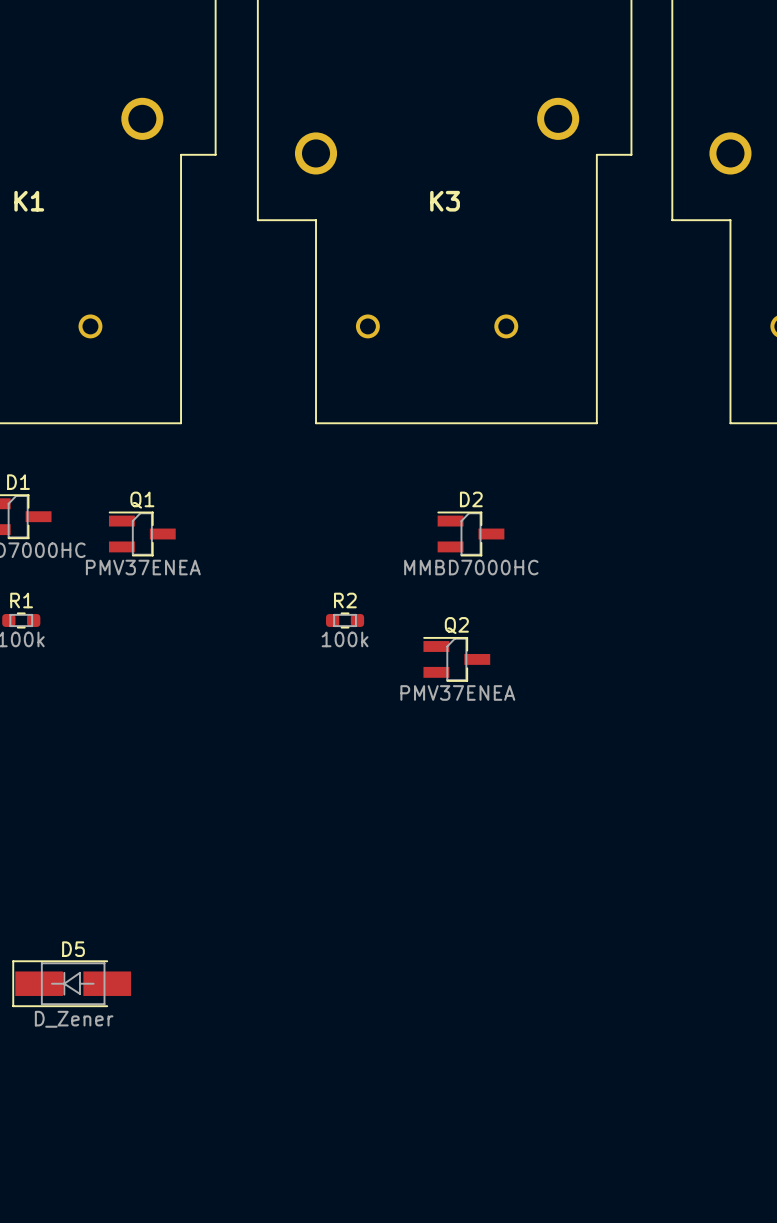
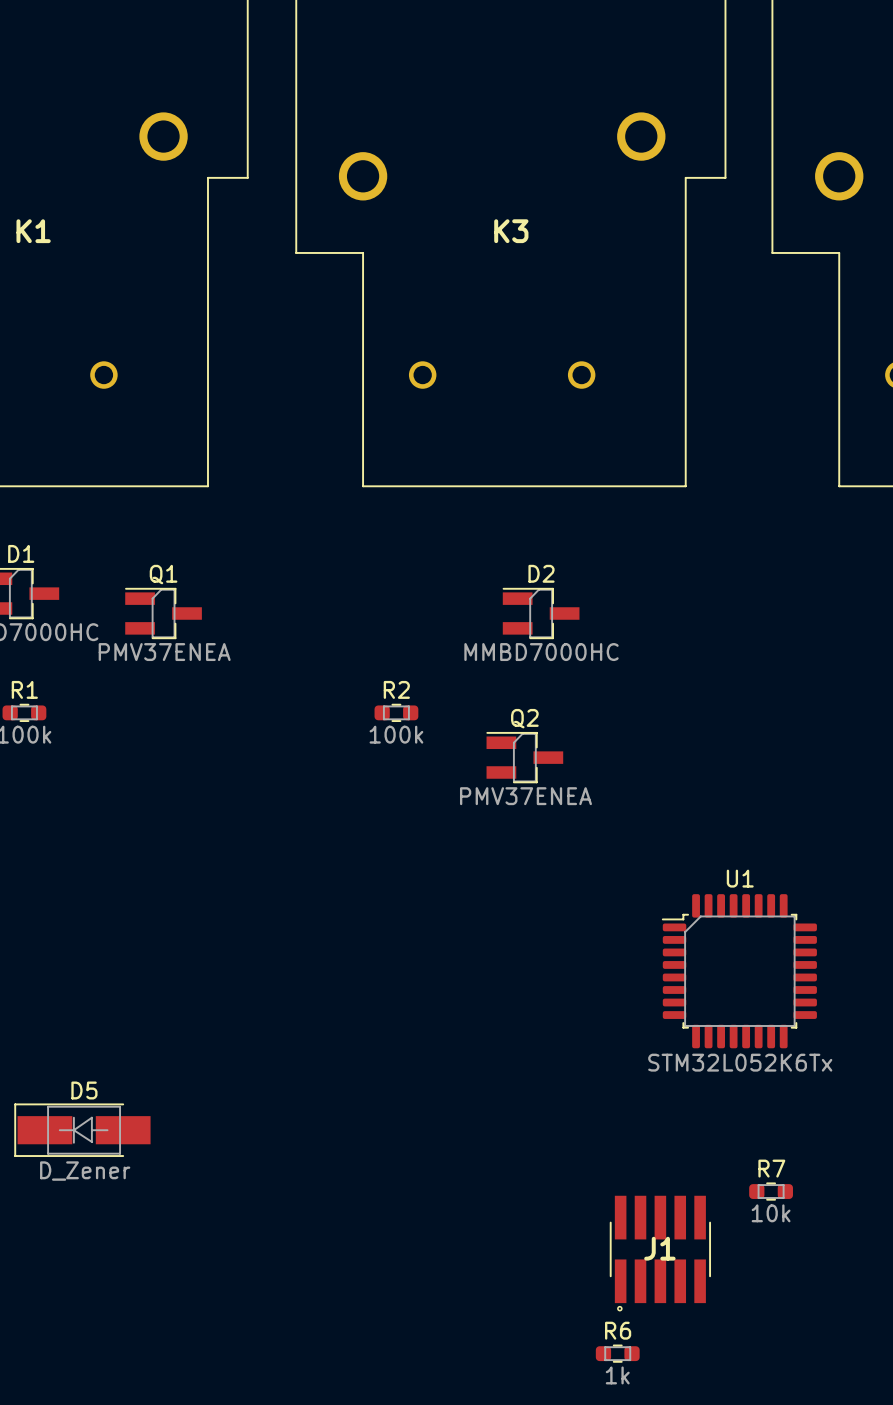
U1: none -> STM32L052K6Tx (739, 971)
R7: none -> 10k (771, 1191)
J1: none -> (660, 1253)
R6: none -> 1k (617, 1353)

